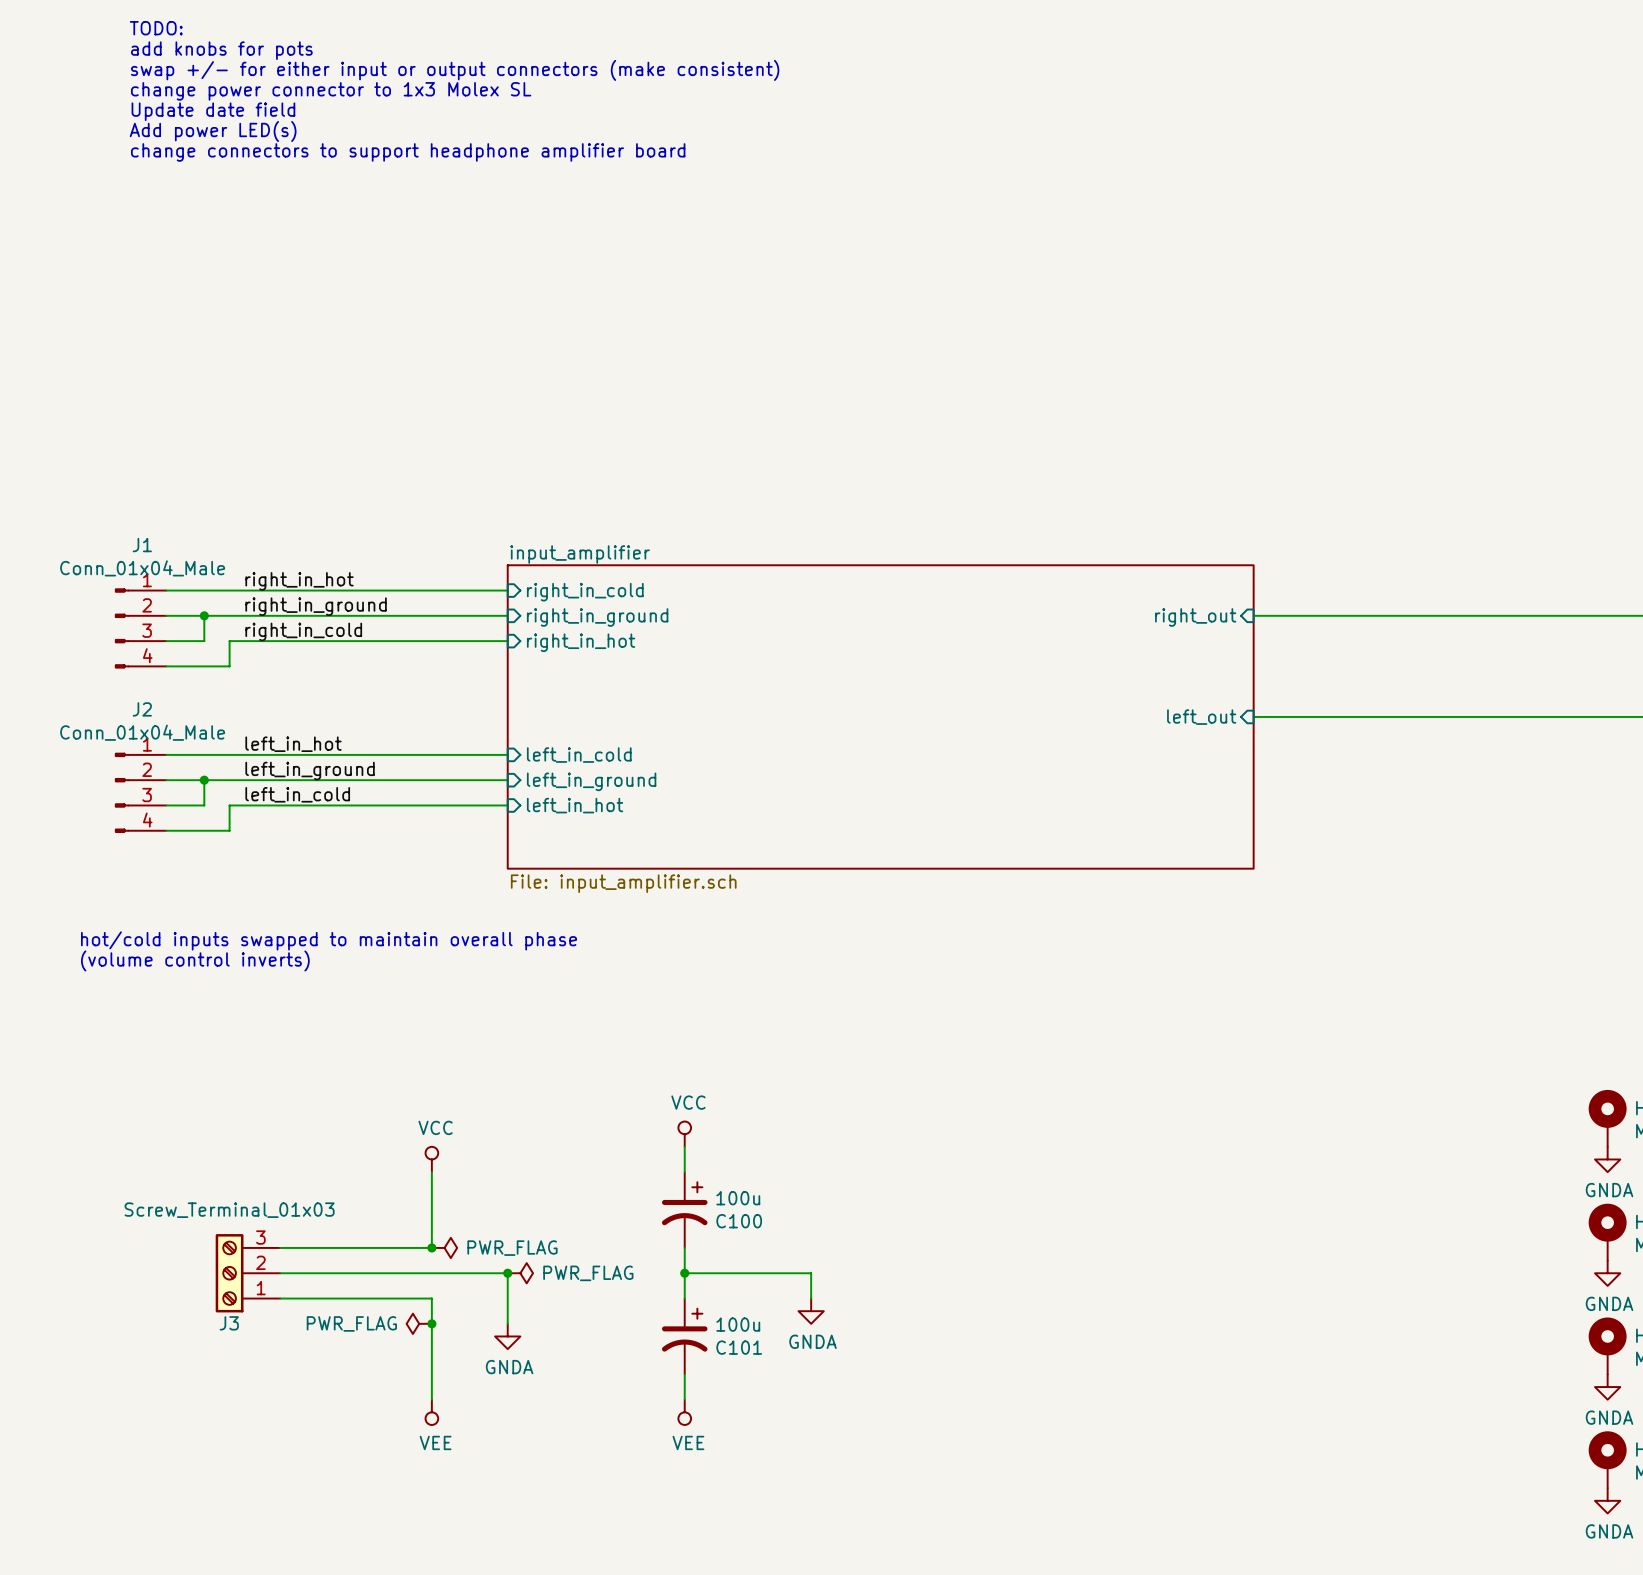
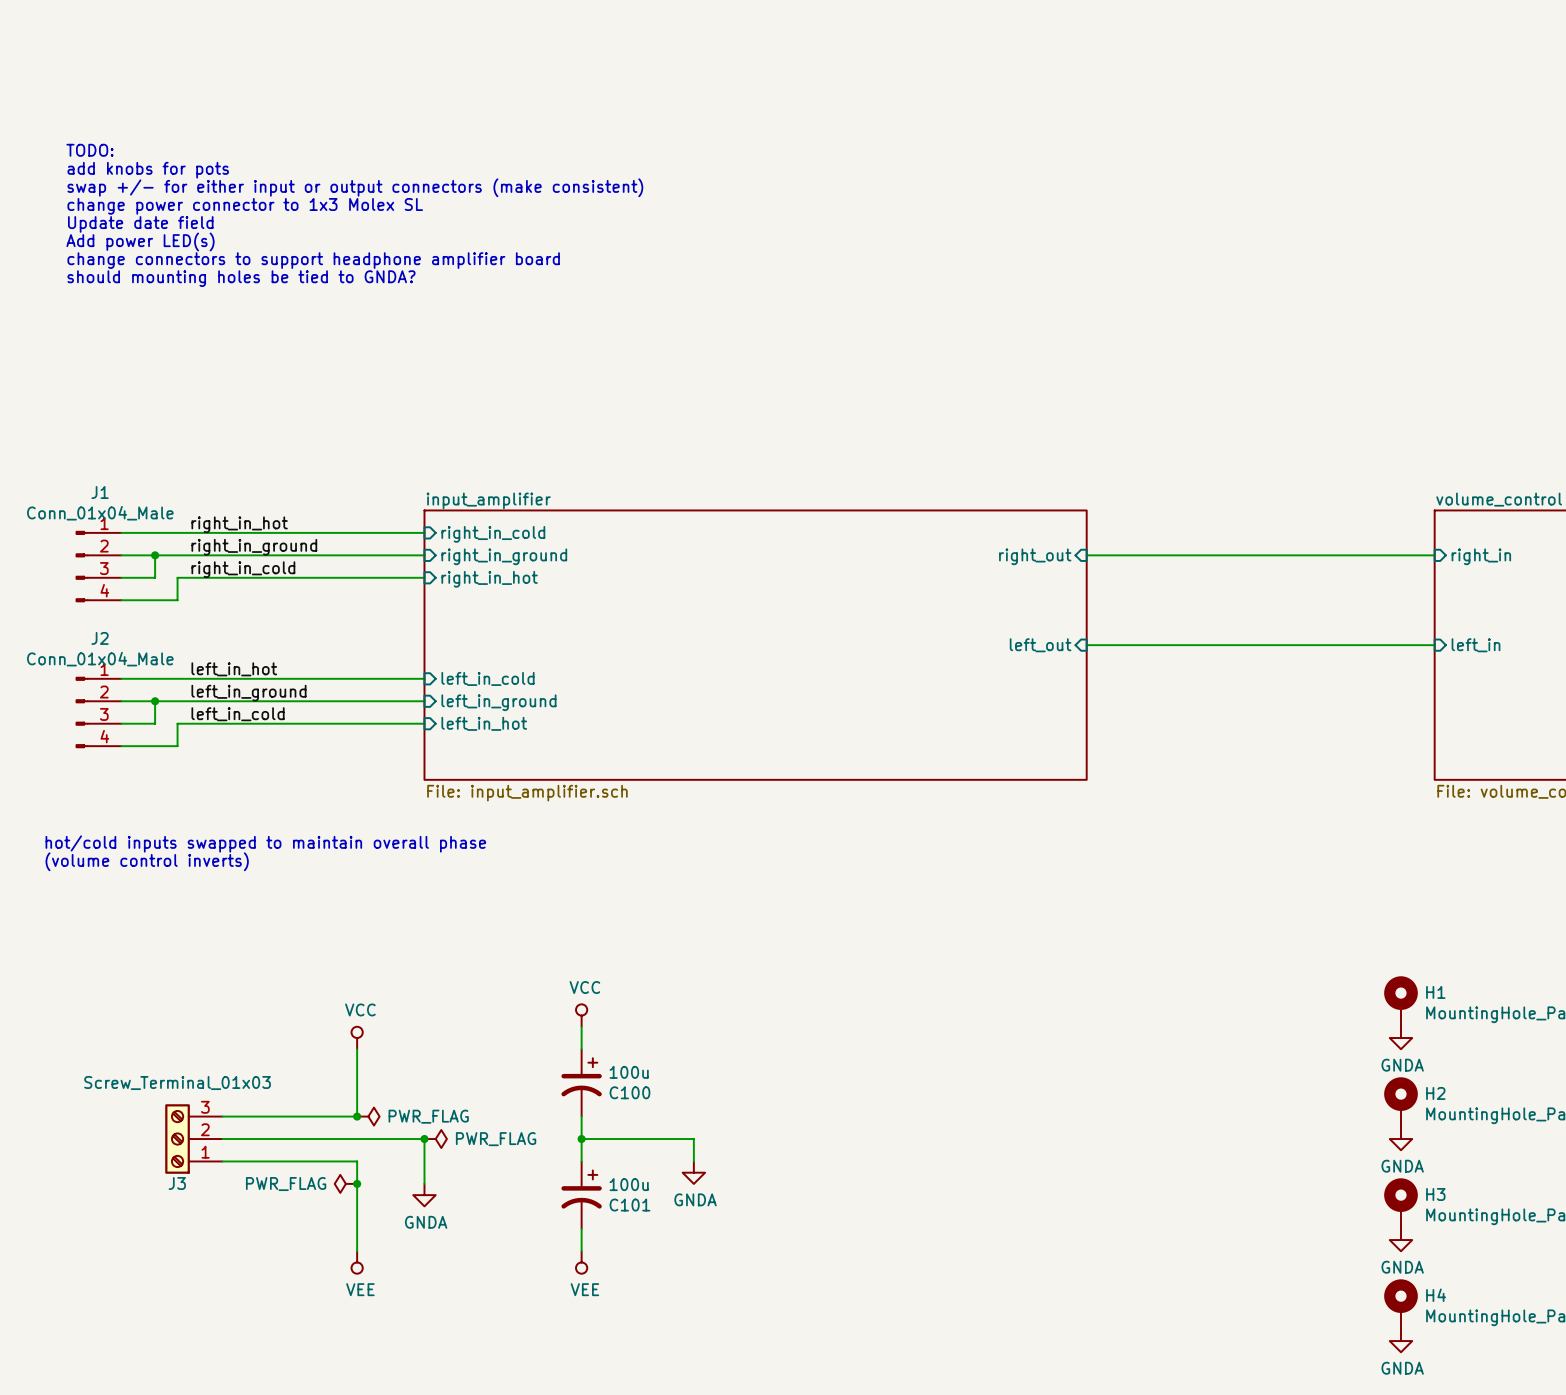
text position: TODO: (156, 28) -> TODO: (89, 150)
text position: add knobs for pots (221, 50) -> add knobs for pots (148, 170)
text position: swap +/- for either input or output connectors (make consistent) (455, 70) -> swap +/- for either input or output connectors (make consistent) (355, 187)
text position: change power connector to 1x3 Molex SL (331, 91) -> change power connector to 1x3 Molex SL (245, 206)
text position: Update date field (213, 111) -> Update date field (140, 224)
text position: Add power LED(s) (213, 131) -> Add power LED(s) (140, 241)
text position: change connectors to support headphone amplifier board (408, 152) -> change connectors to support headphone amplifier board (313, 260)
text: none -> should mounting holes be tied to GNDA? (241, 278)

